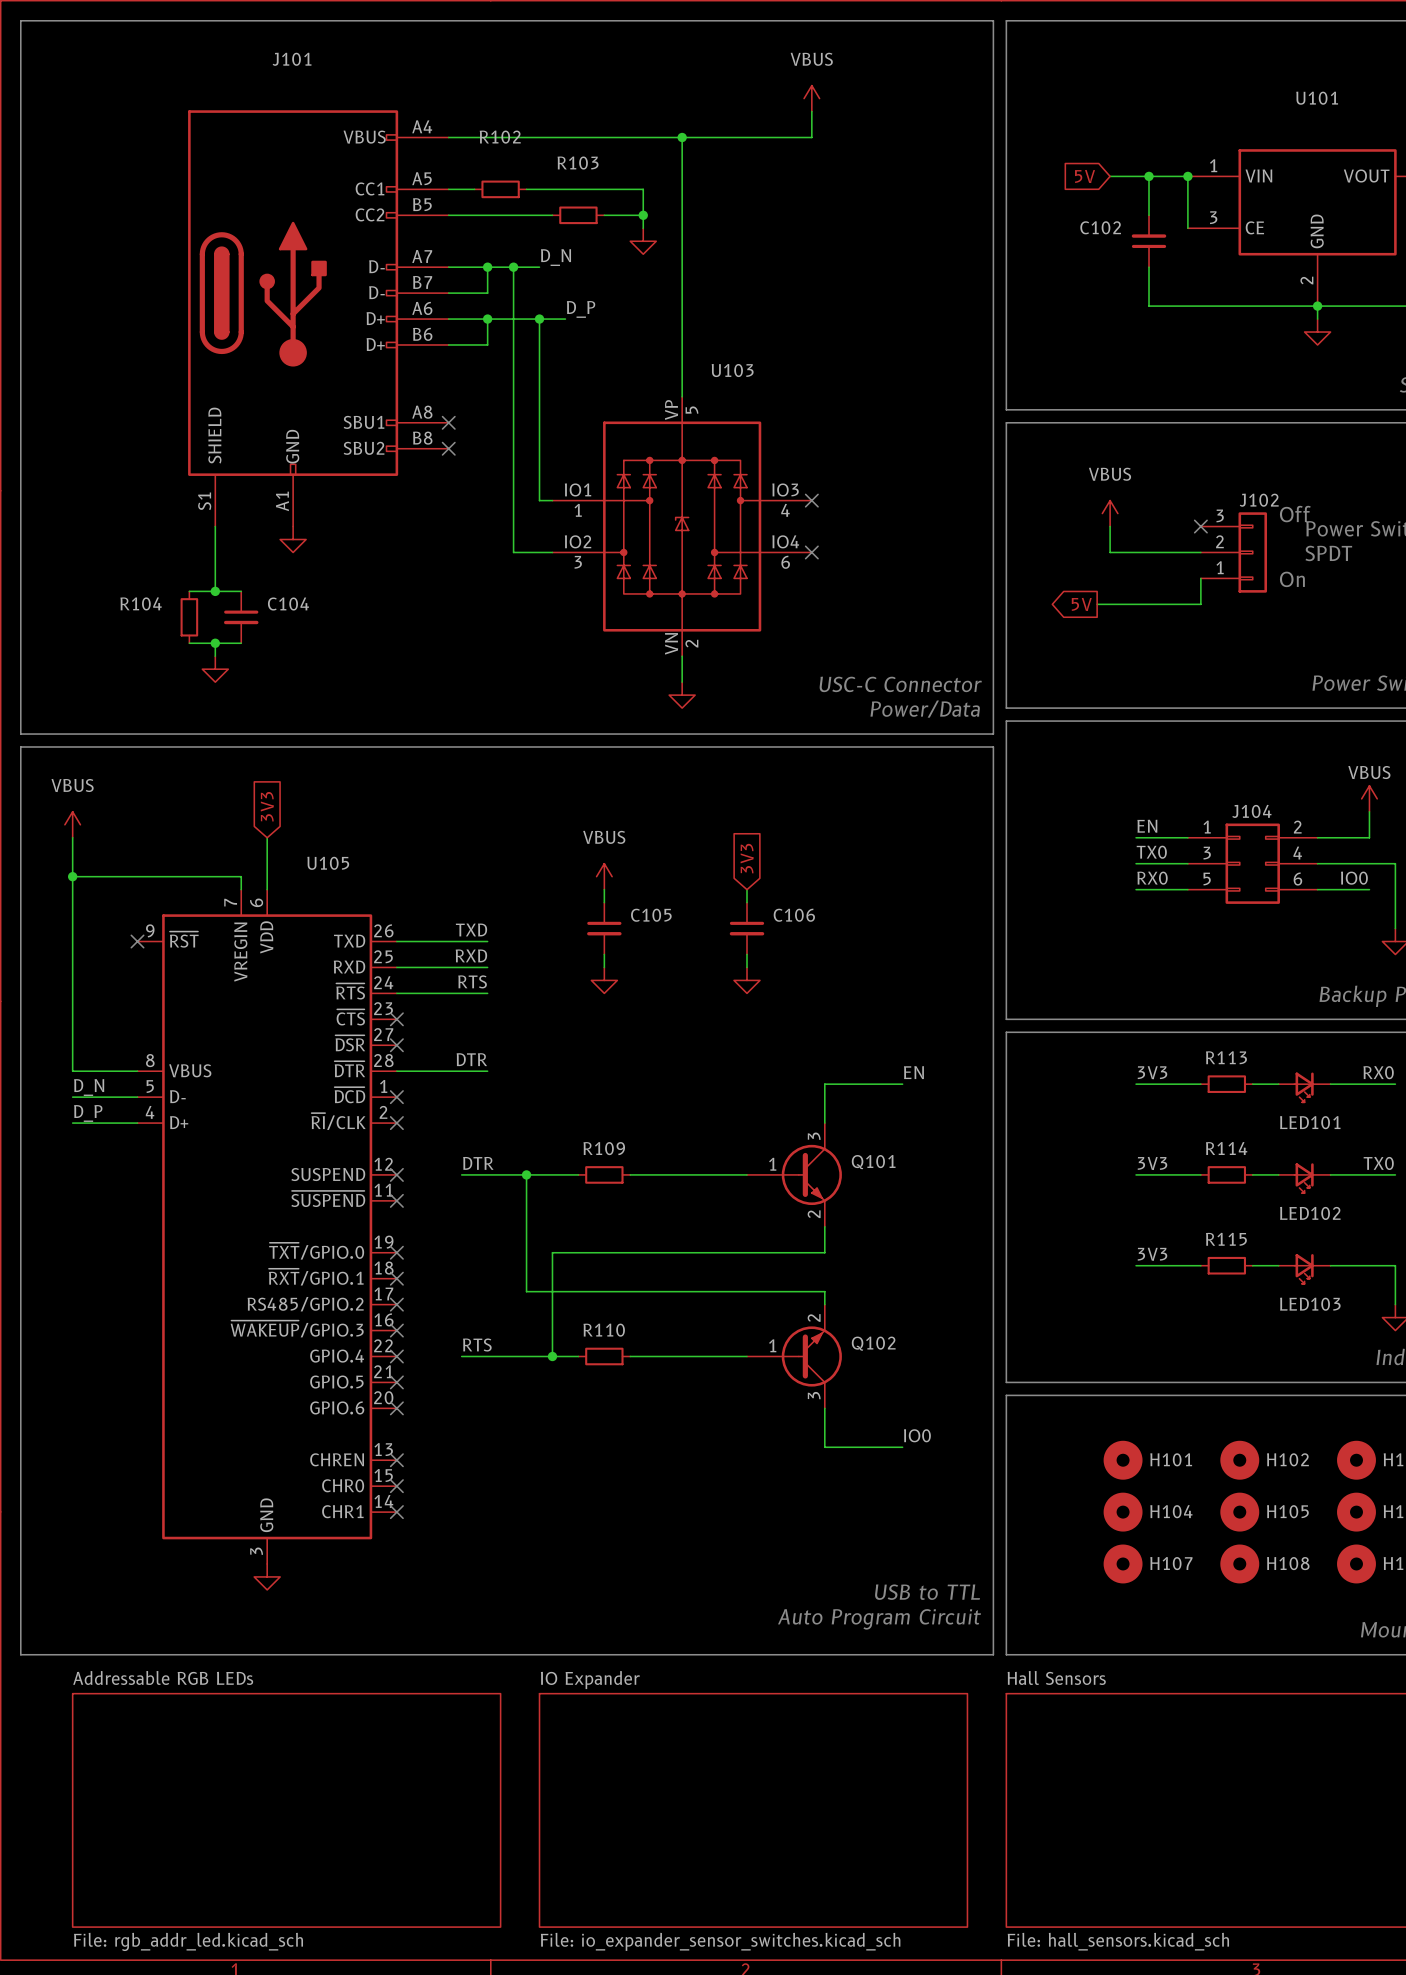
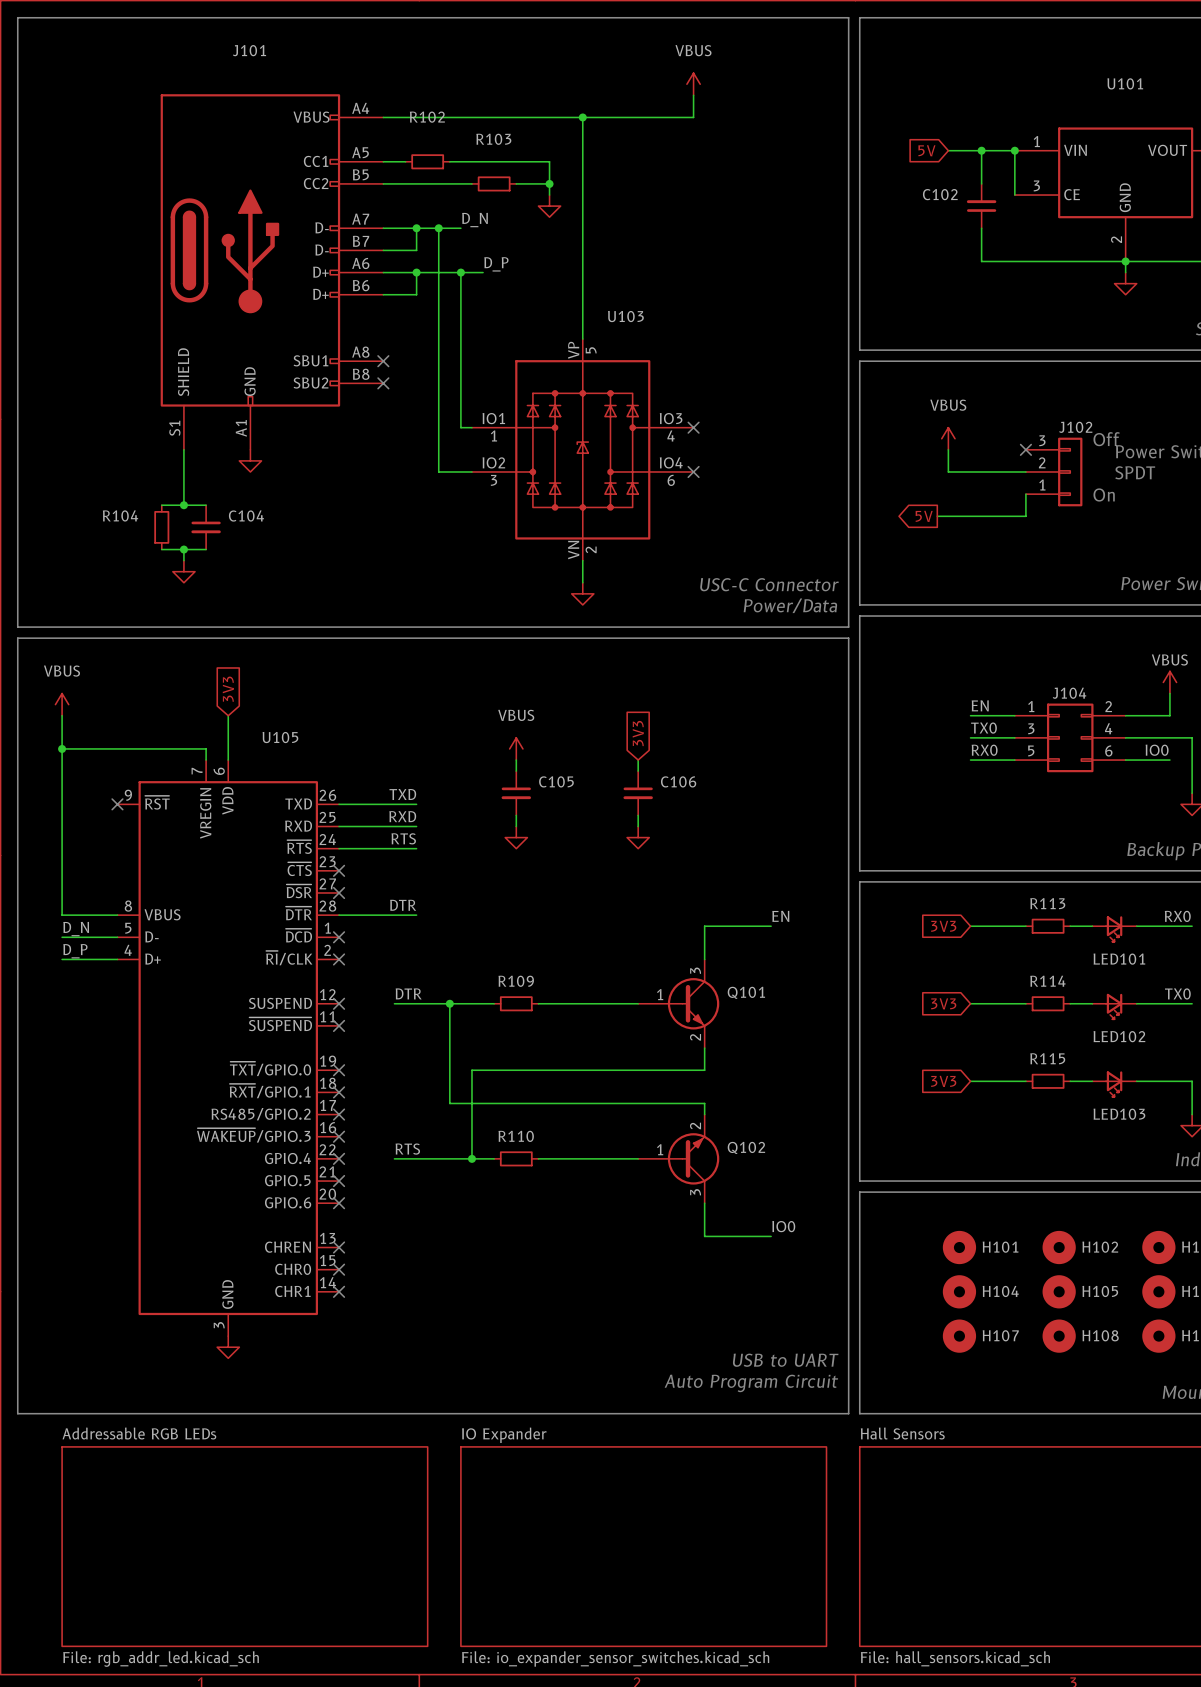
label: 3V3 (1152, 1072) -> none
global label: none -> 3V3 (943, 926)
label: 3V3 (1152, 1163) -> none
global label: none -> 3V3 (943, 1003)
label: 3V3 (1152, 1254) -> none
global label: none -> 3V3 (943, 1081)
text: USB to TTL (927, 1592) -> USB to UART (785, 1360)

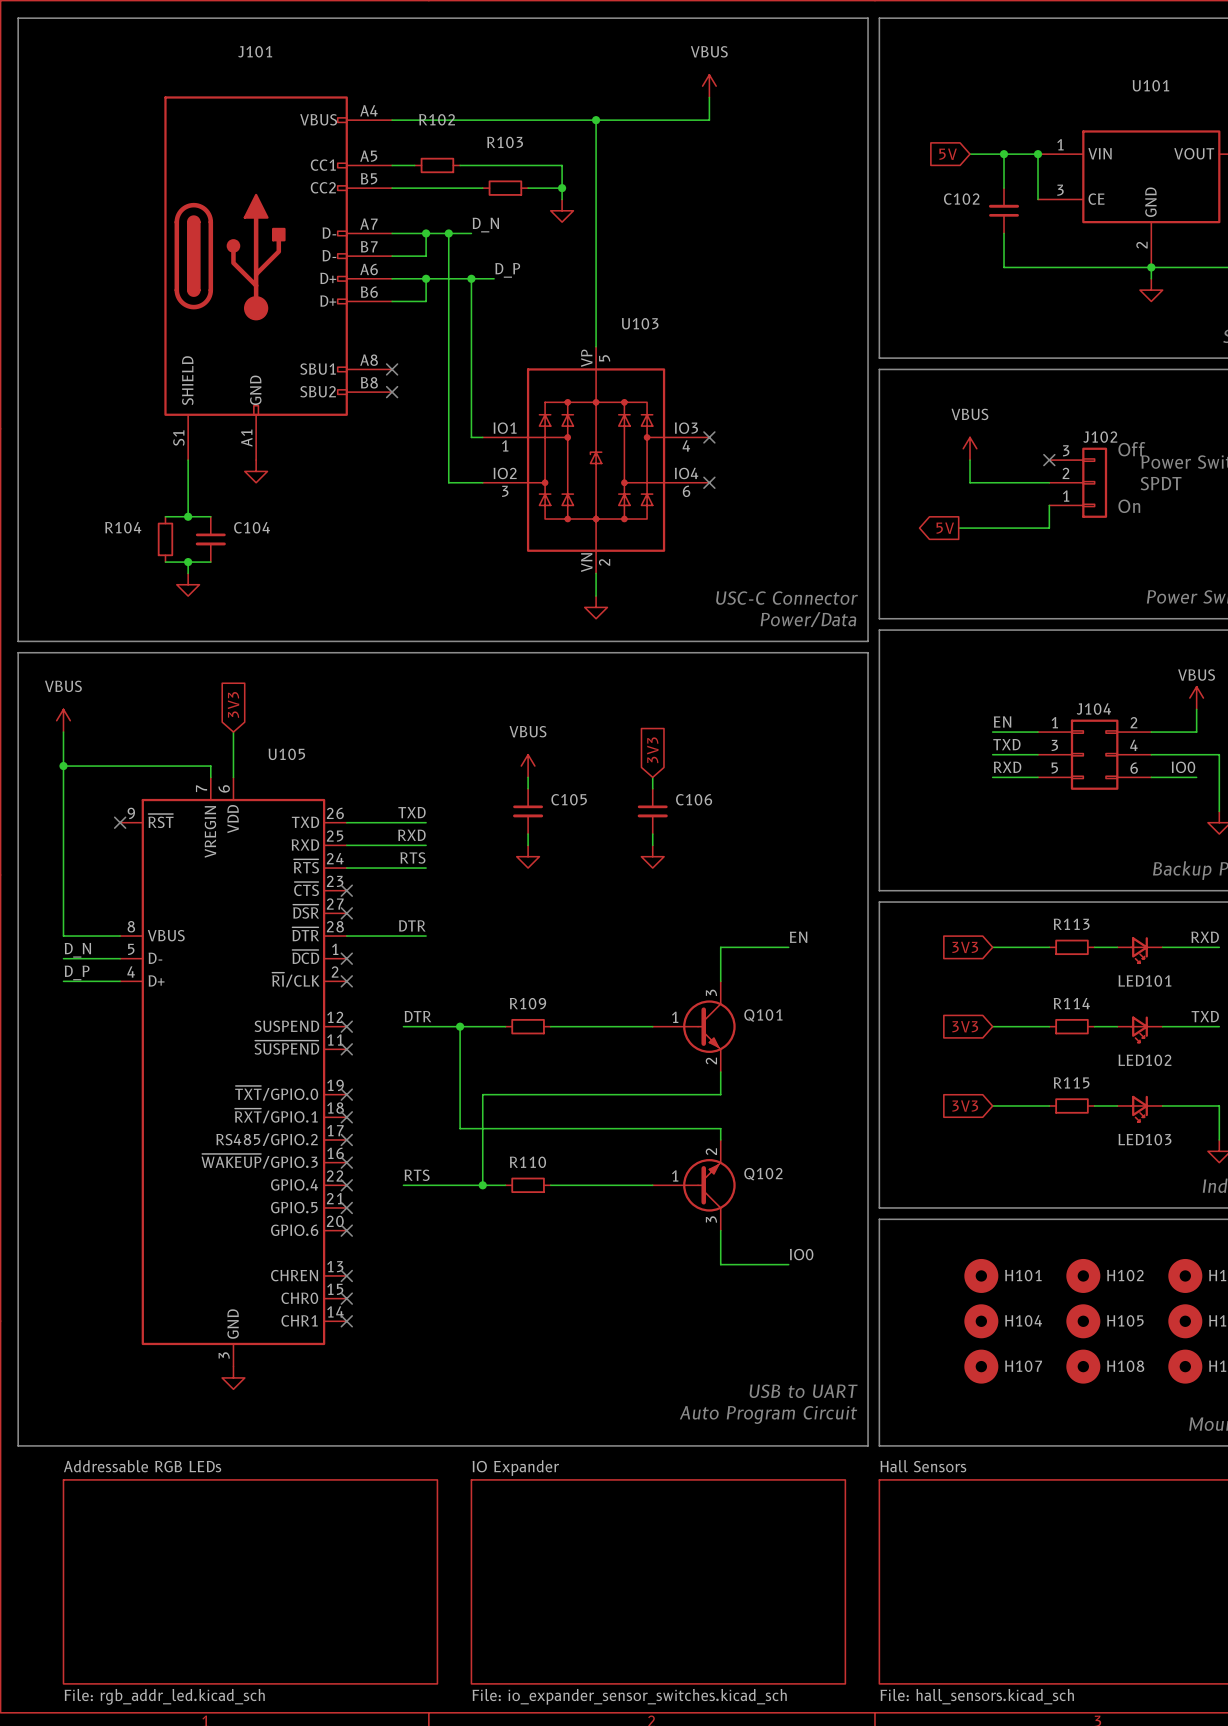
label: TX0 (983, 728) -> TXD (1006, 744)
label: RX0 (984, 750) -> RXD (1007, 767)
label: RX0 (1177, 916) -> RXD (1205, 937)
label: TX0 (1177, 993) -> TXD (1205, 1016)

